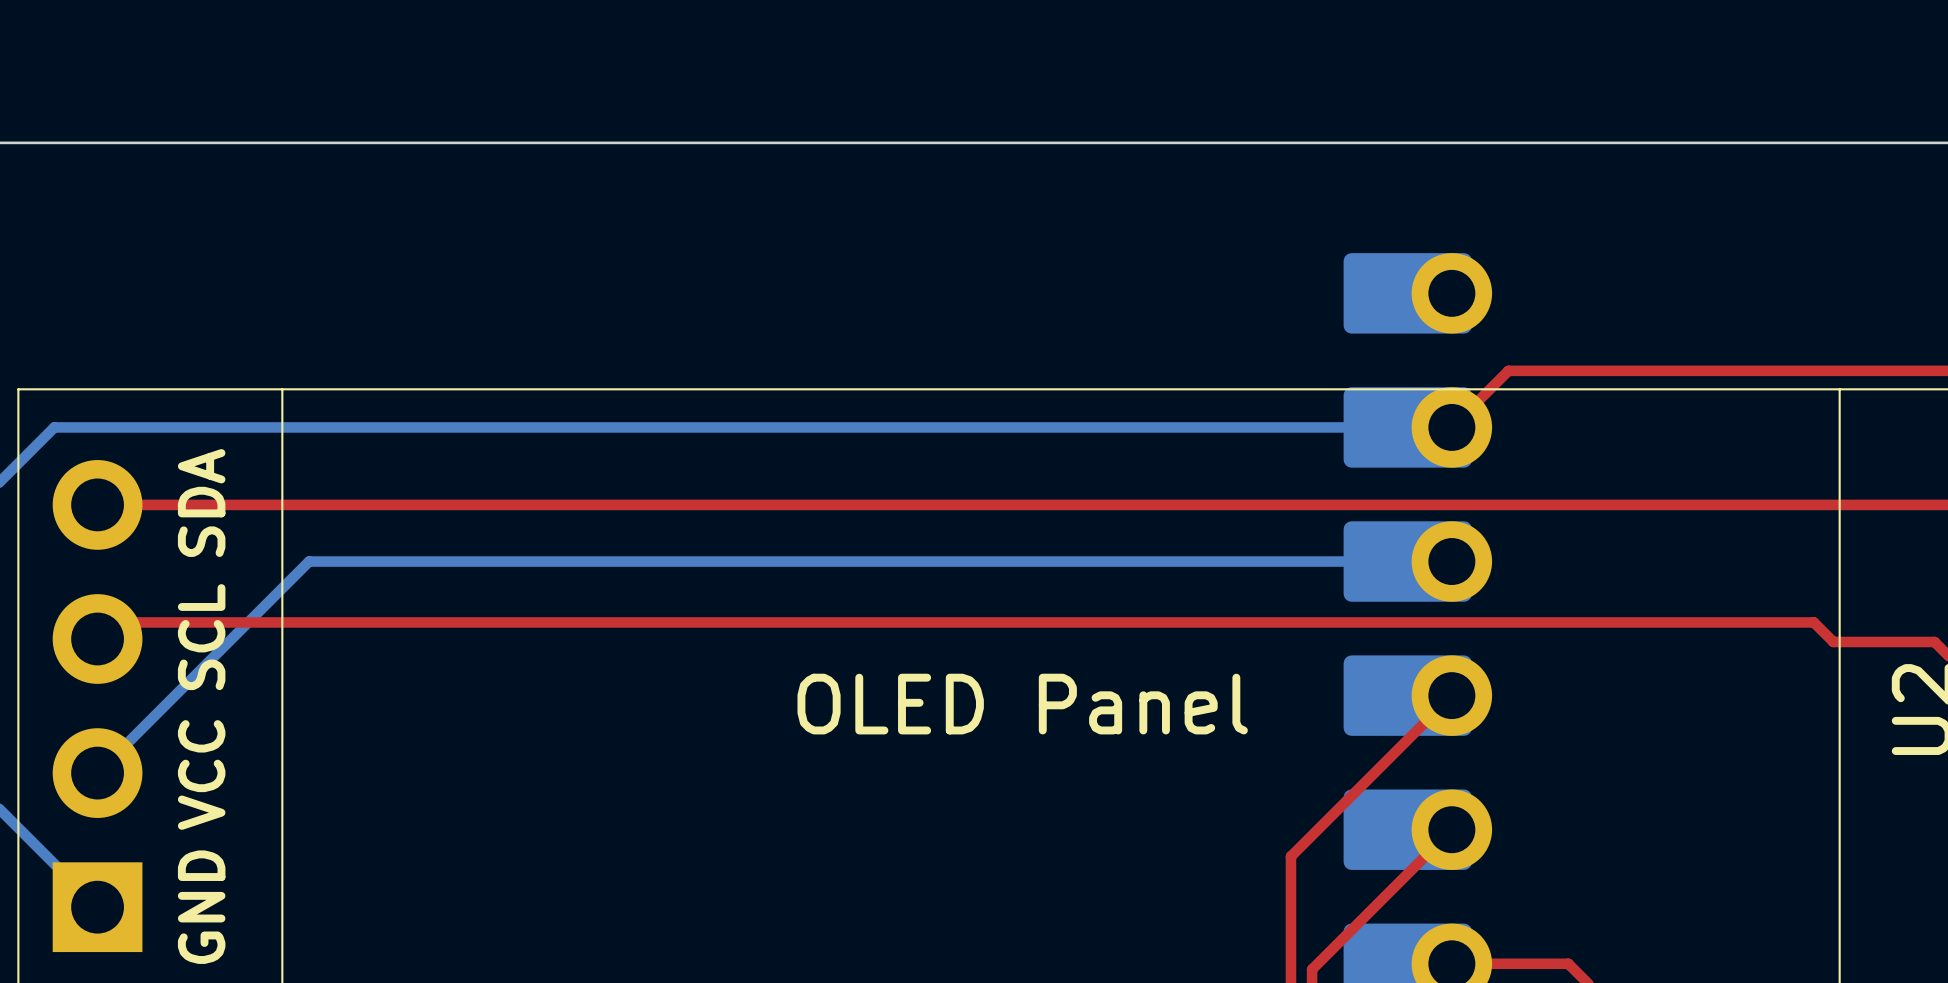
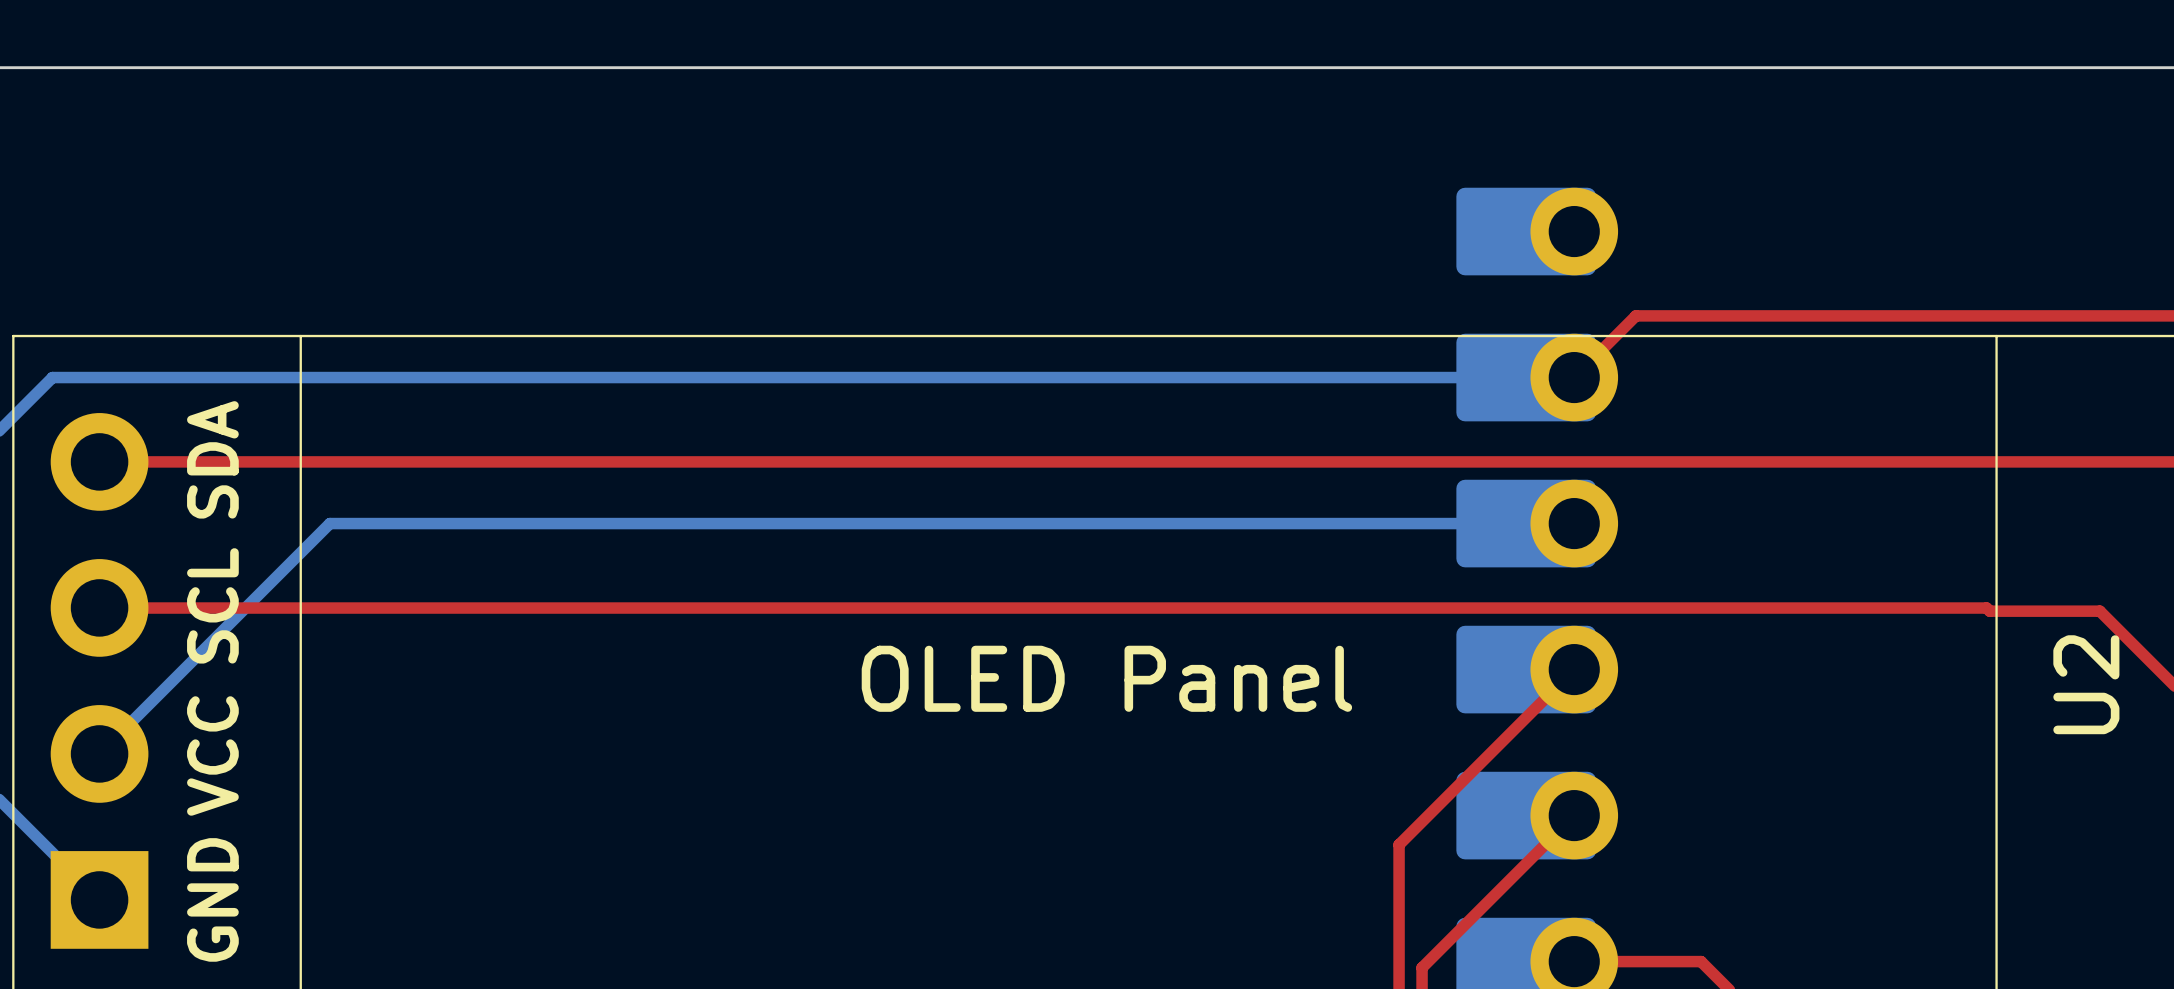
top track: (97, 639) (114, 622) (1813, 622) (1830, 639) -> (99, 608) (1986, 608)

